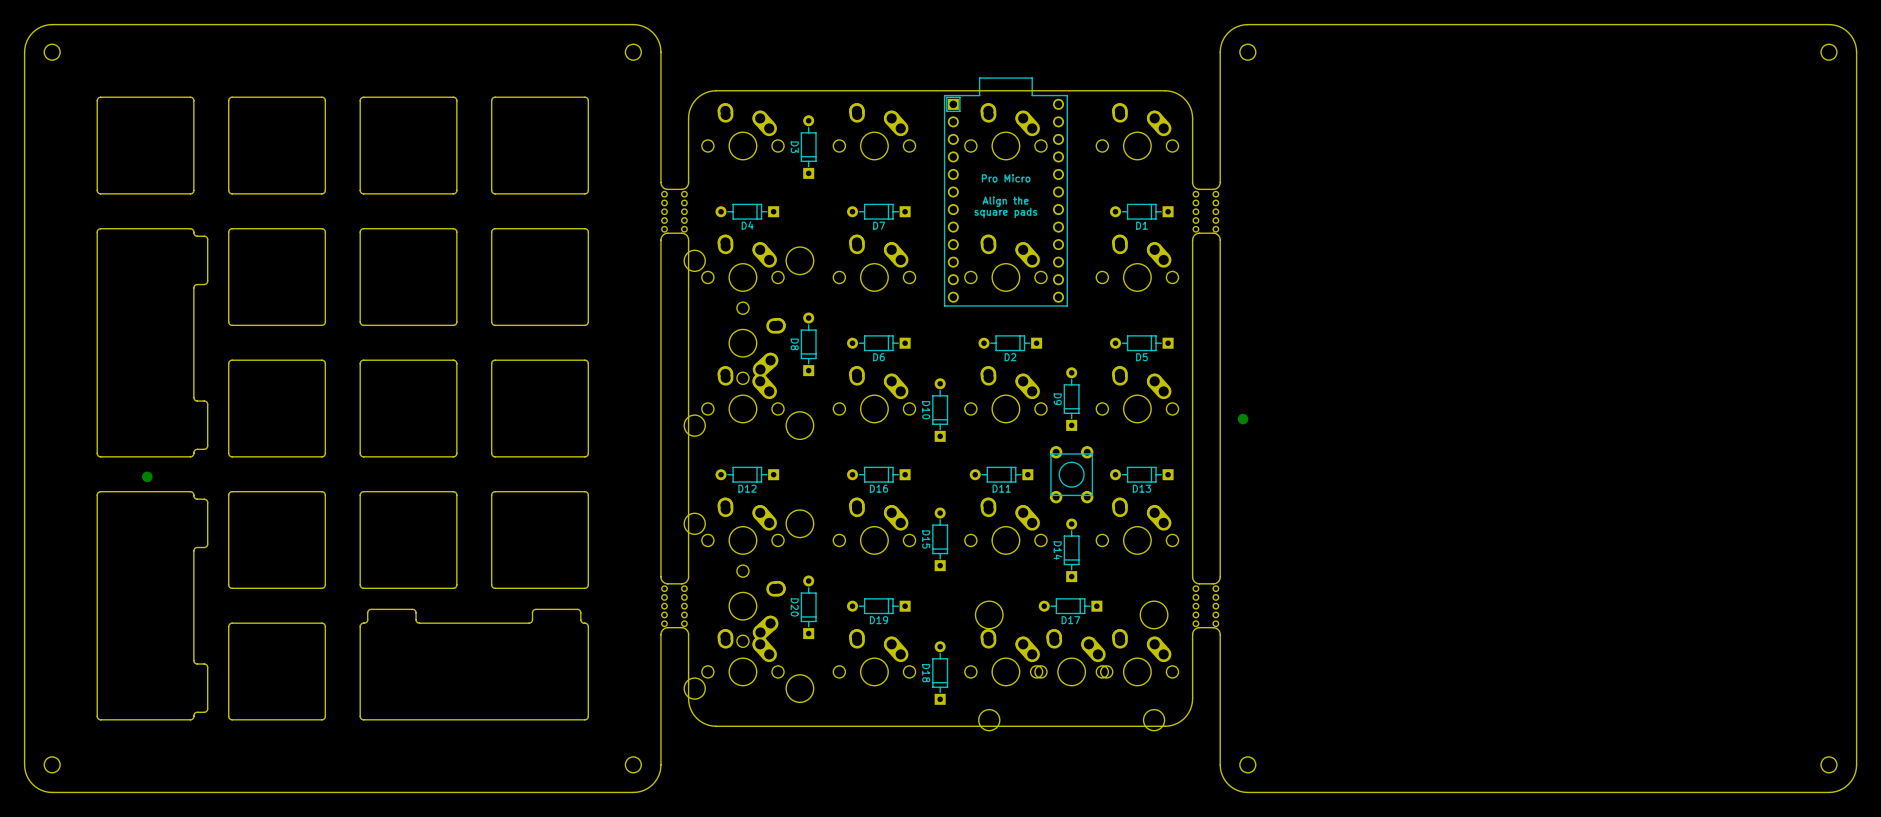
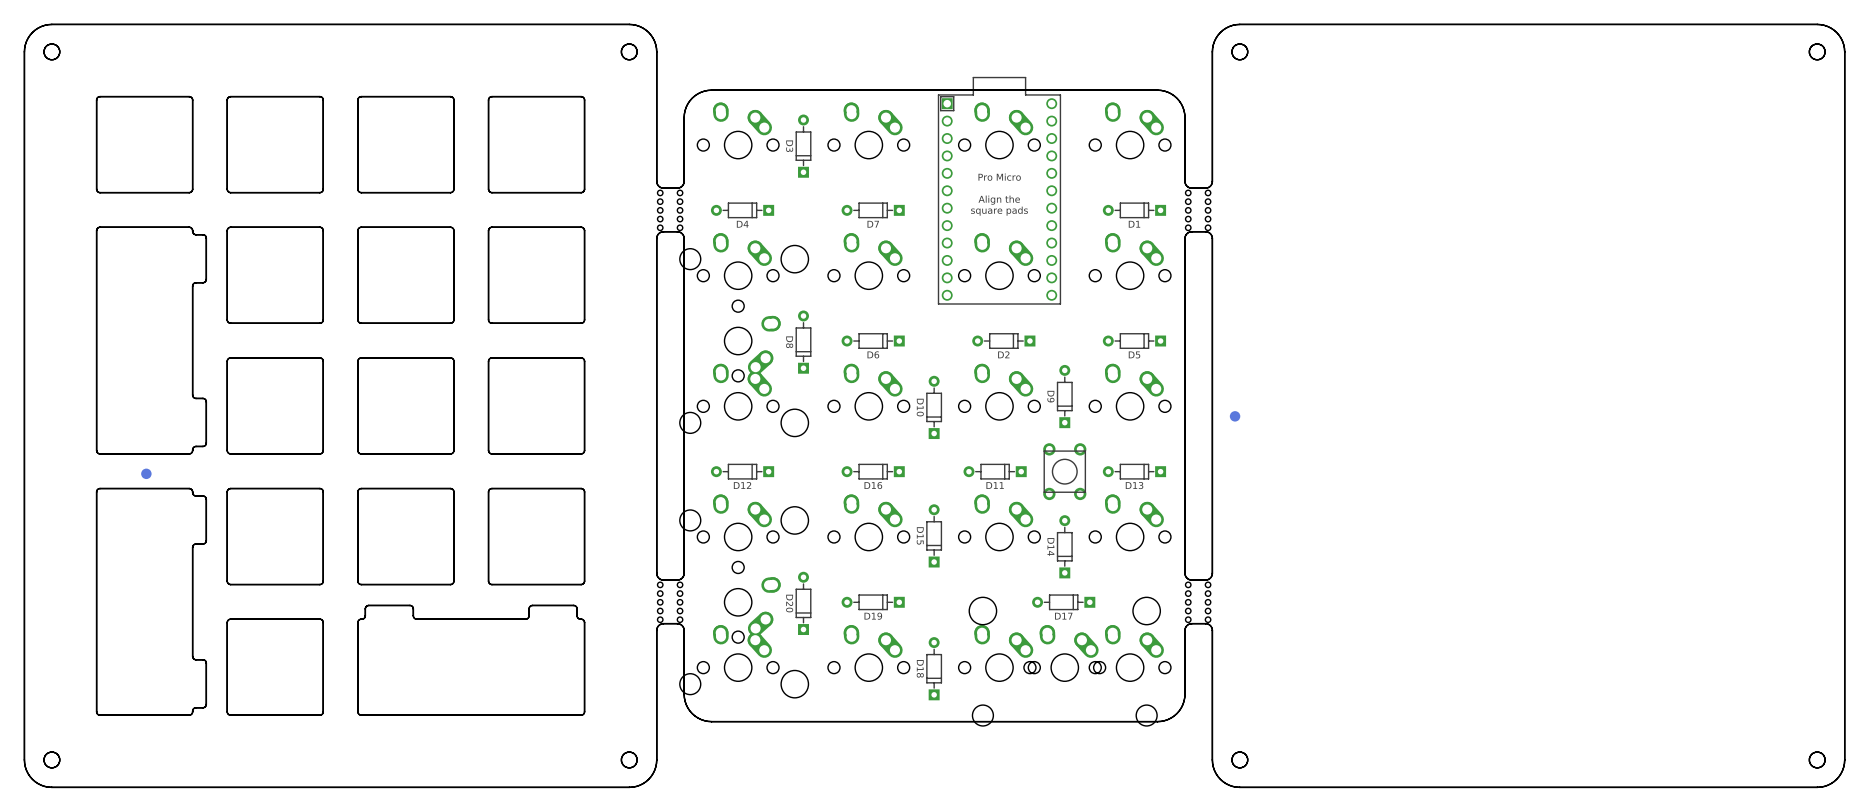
drawing: none -> [23, 23, 1846, 789]

